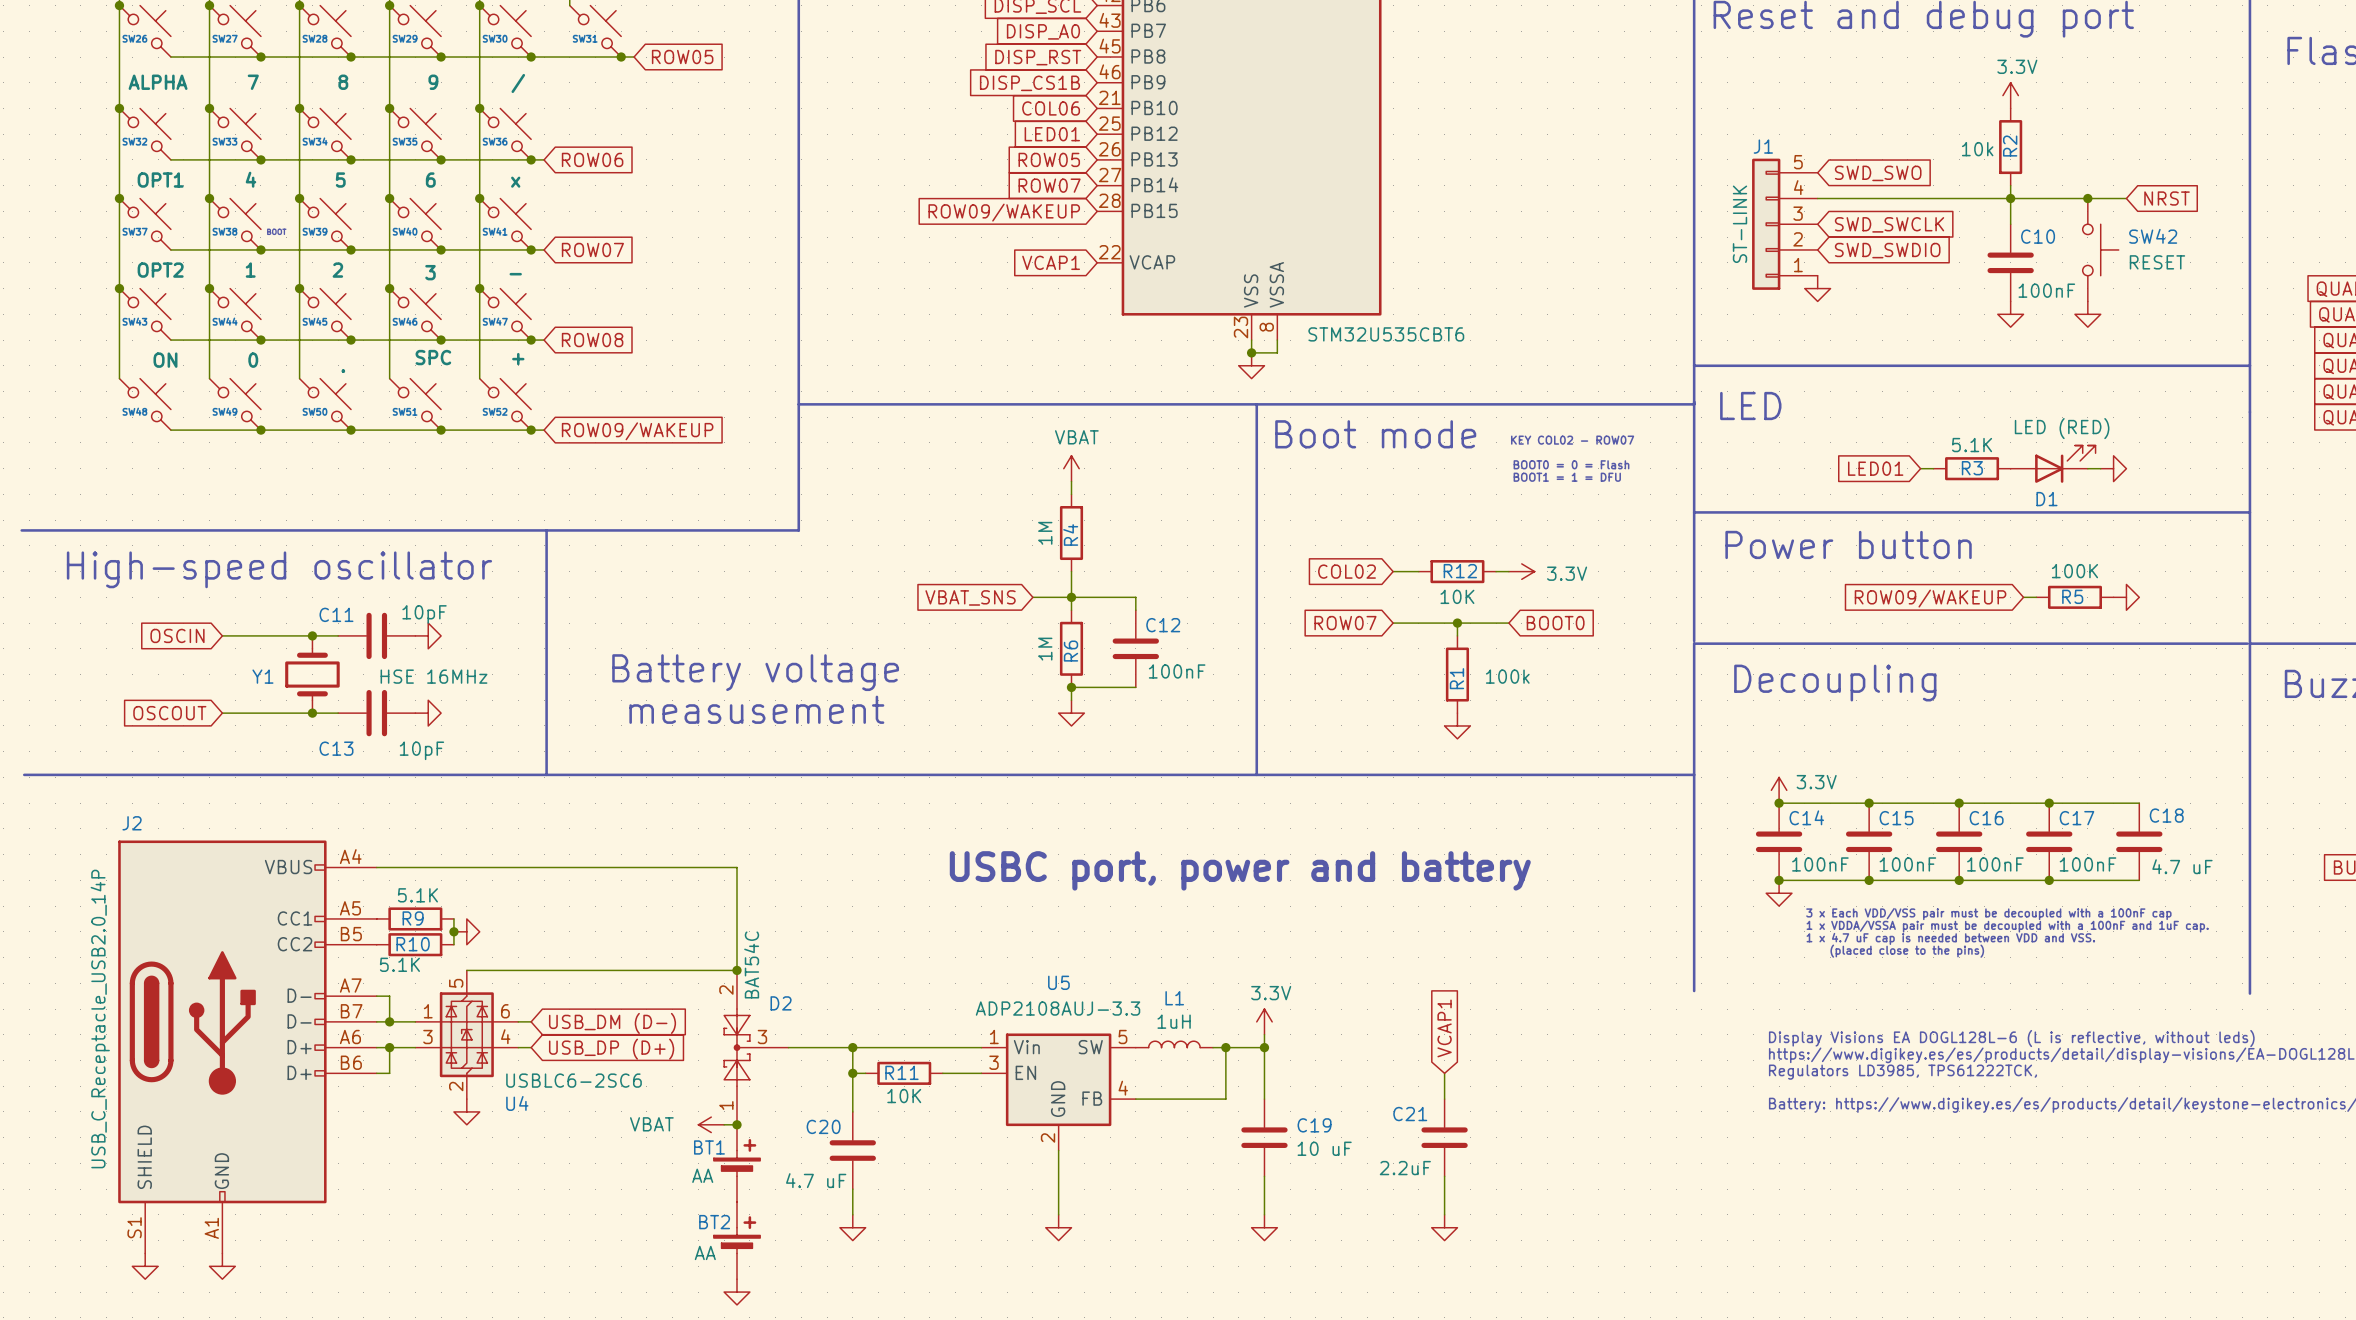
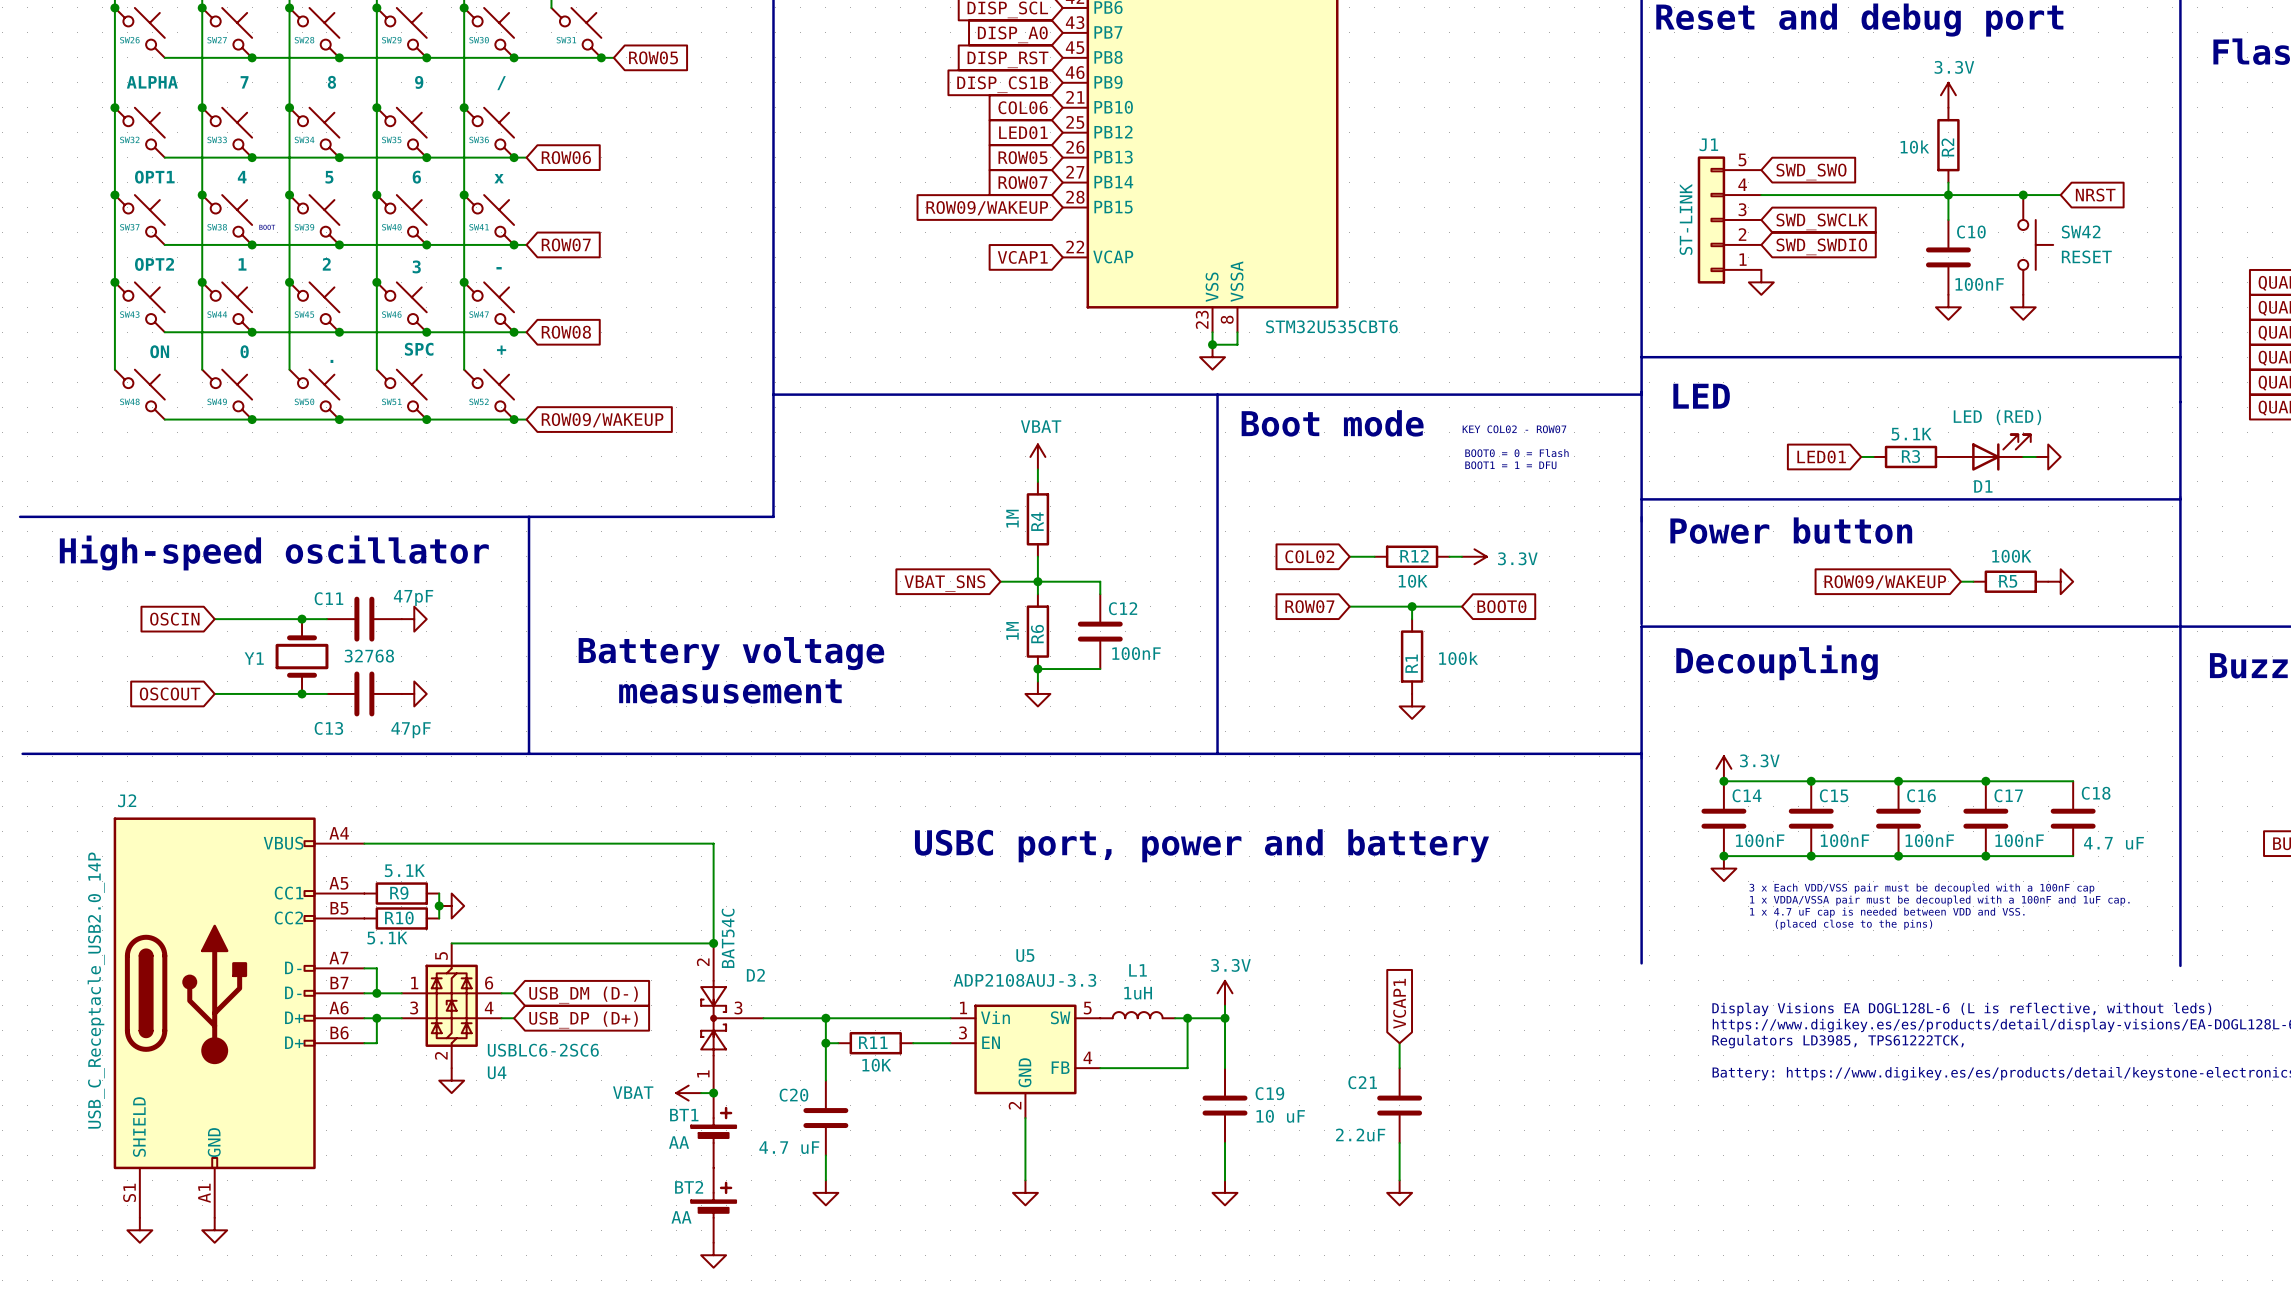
C11 value: 10pF (424, 614) -> 47pF (413, 597)
Y1 value: HSE 16MHz (433, 676) -> 32768 (369, 656)
C13 value: 10pF (421, 750) -> 47pF (411, 730)

